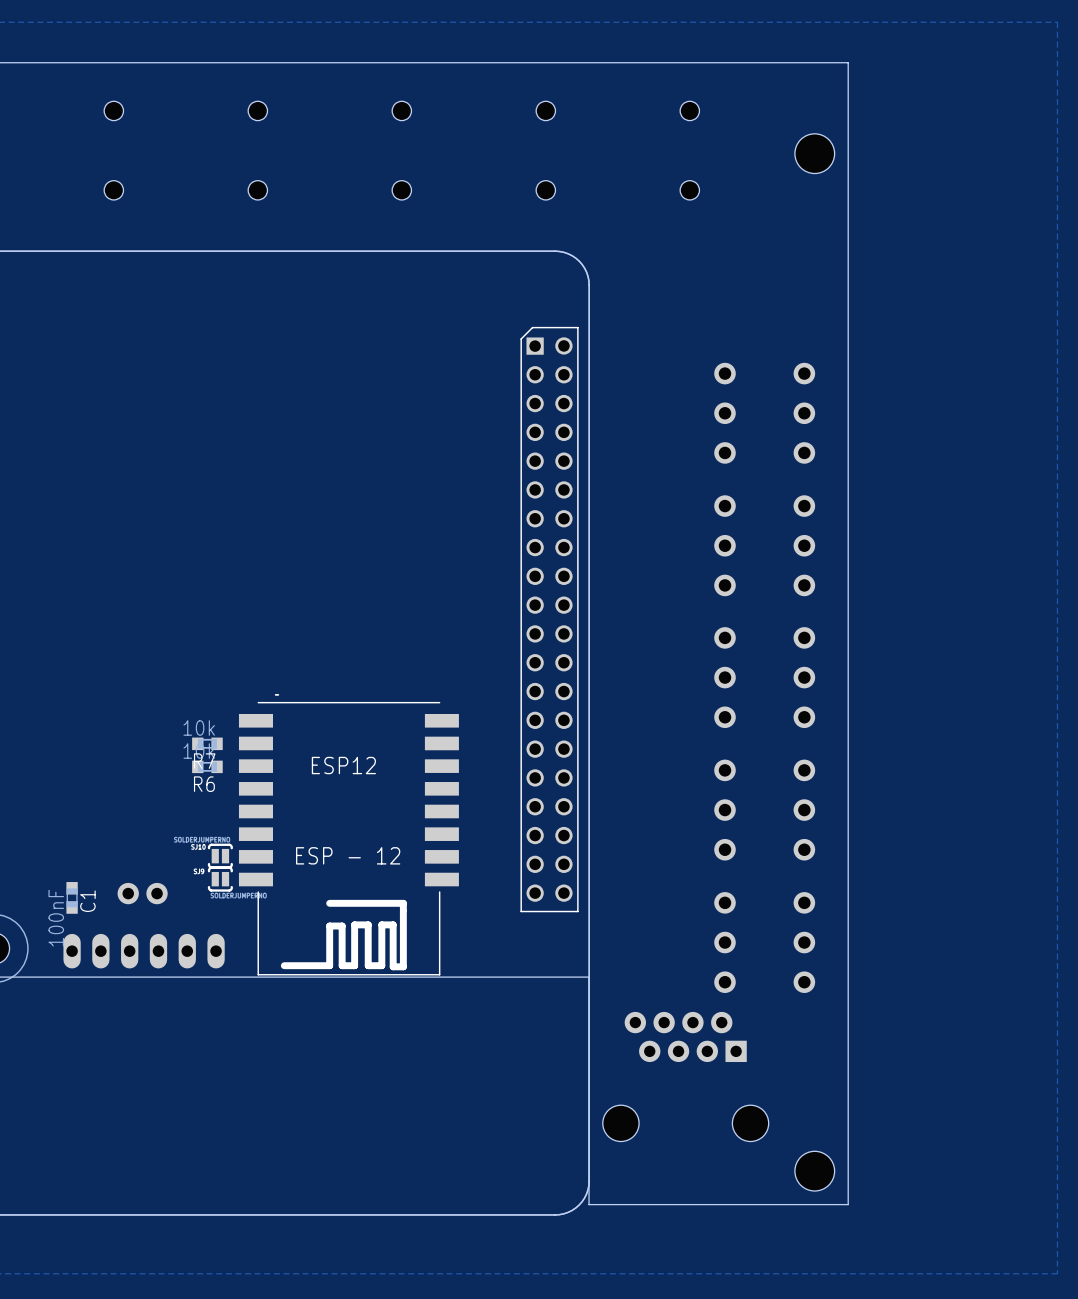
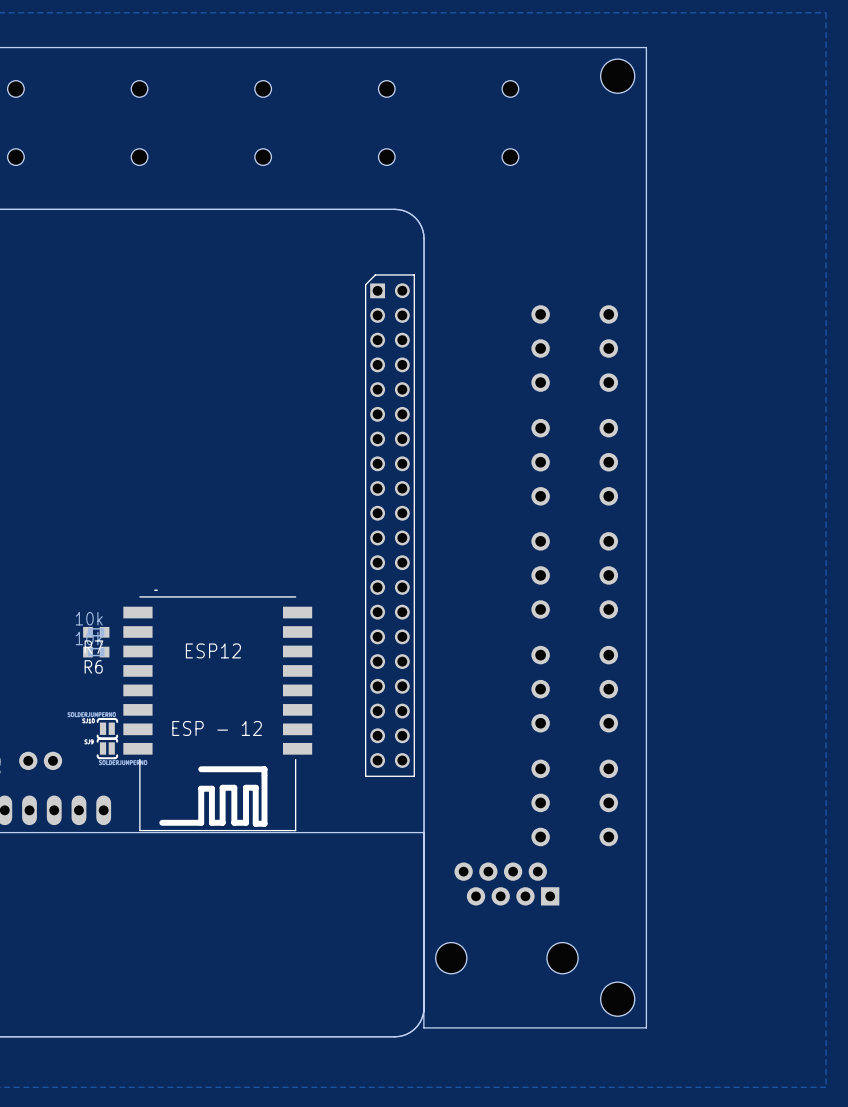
hole position: (814, 153) -> (617, 76)

